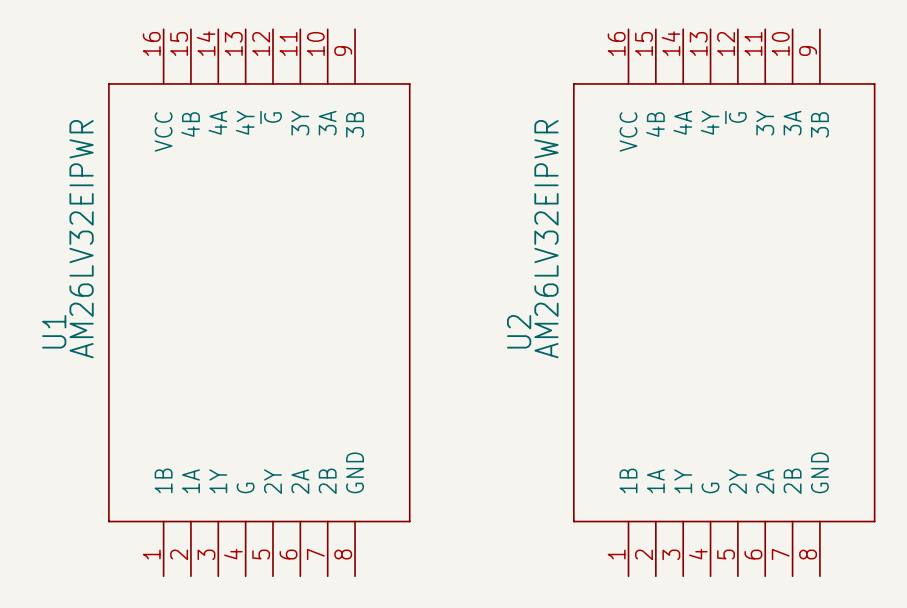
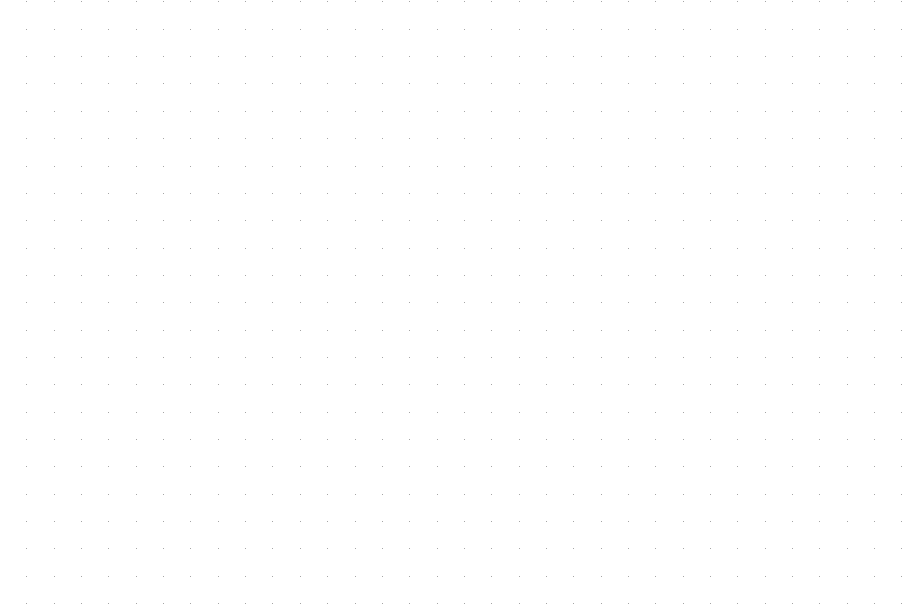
U1: AM26LV32EIPWR (259, 302) -> none
U2: AM26LV32EIPWR (724, 302) -> none

